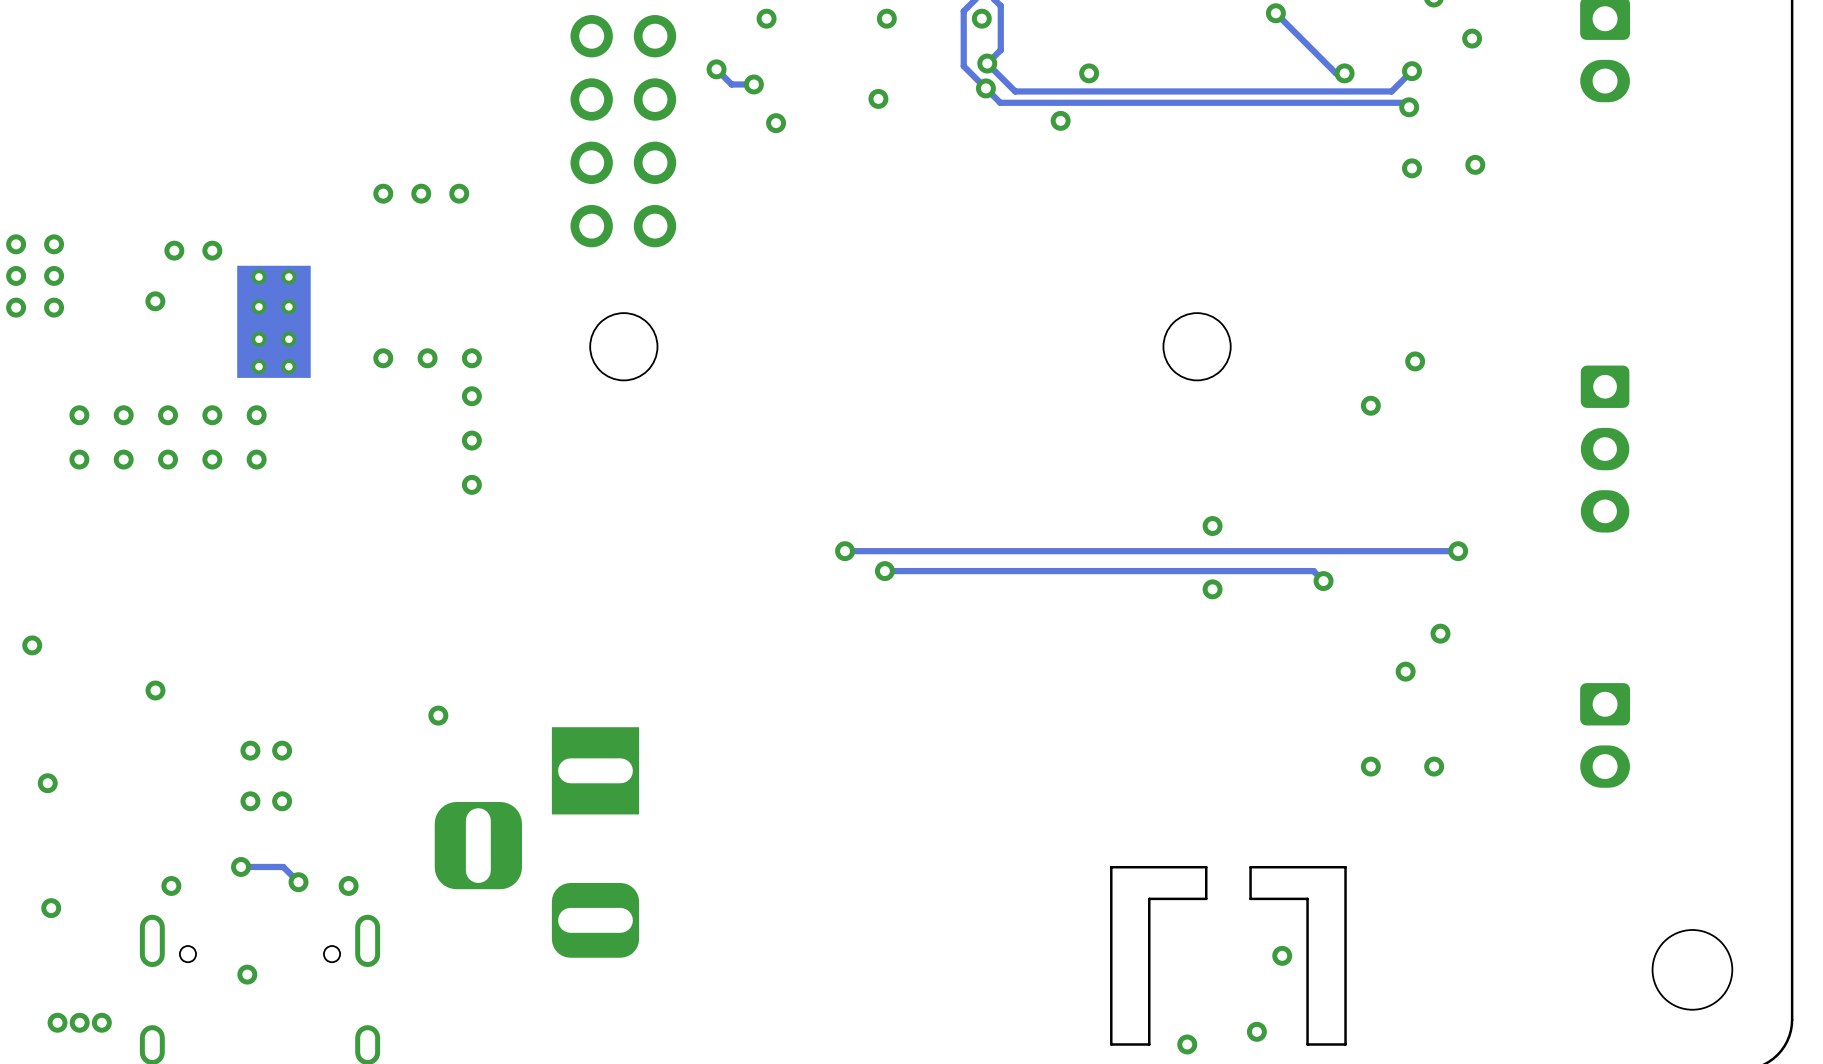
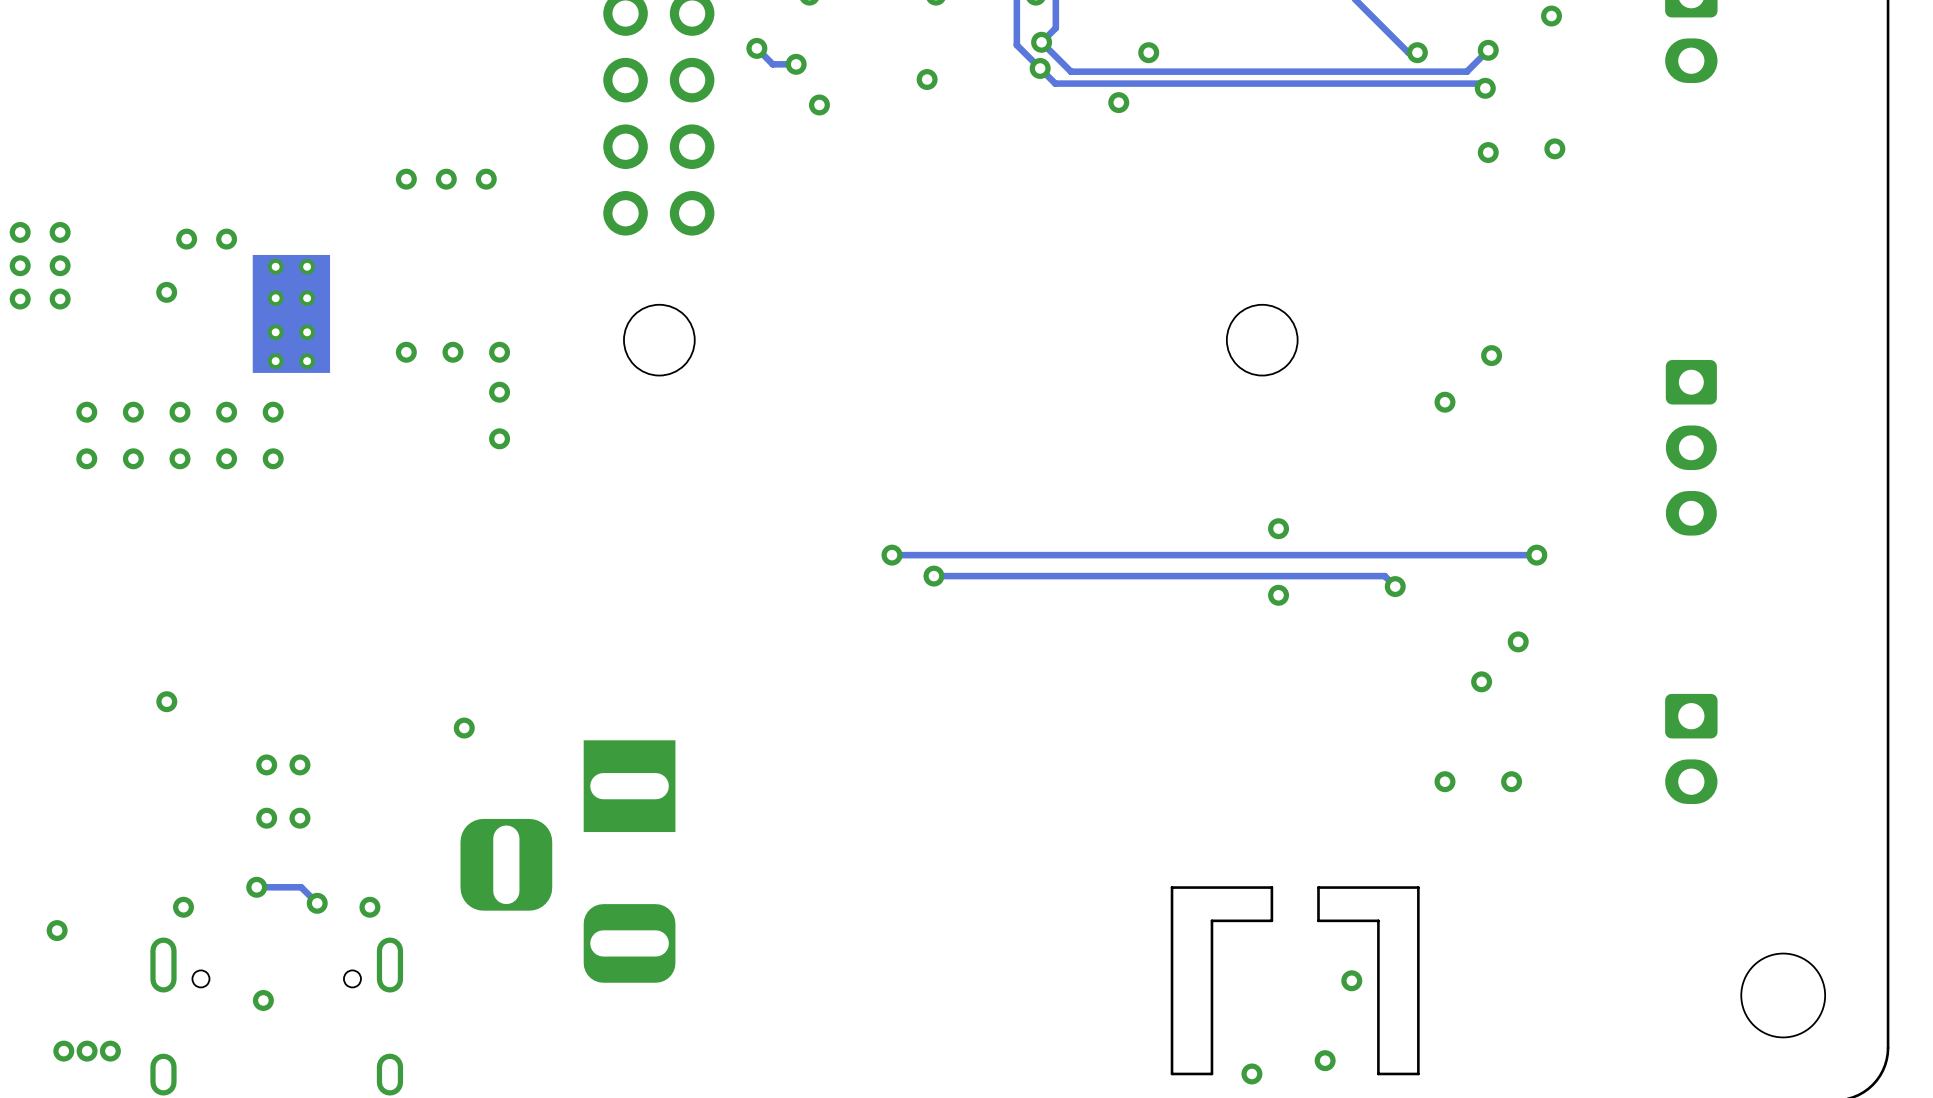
via: (471, 484) -> none
via: (32, 645) -> none
via: (47, 783) -> none

